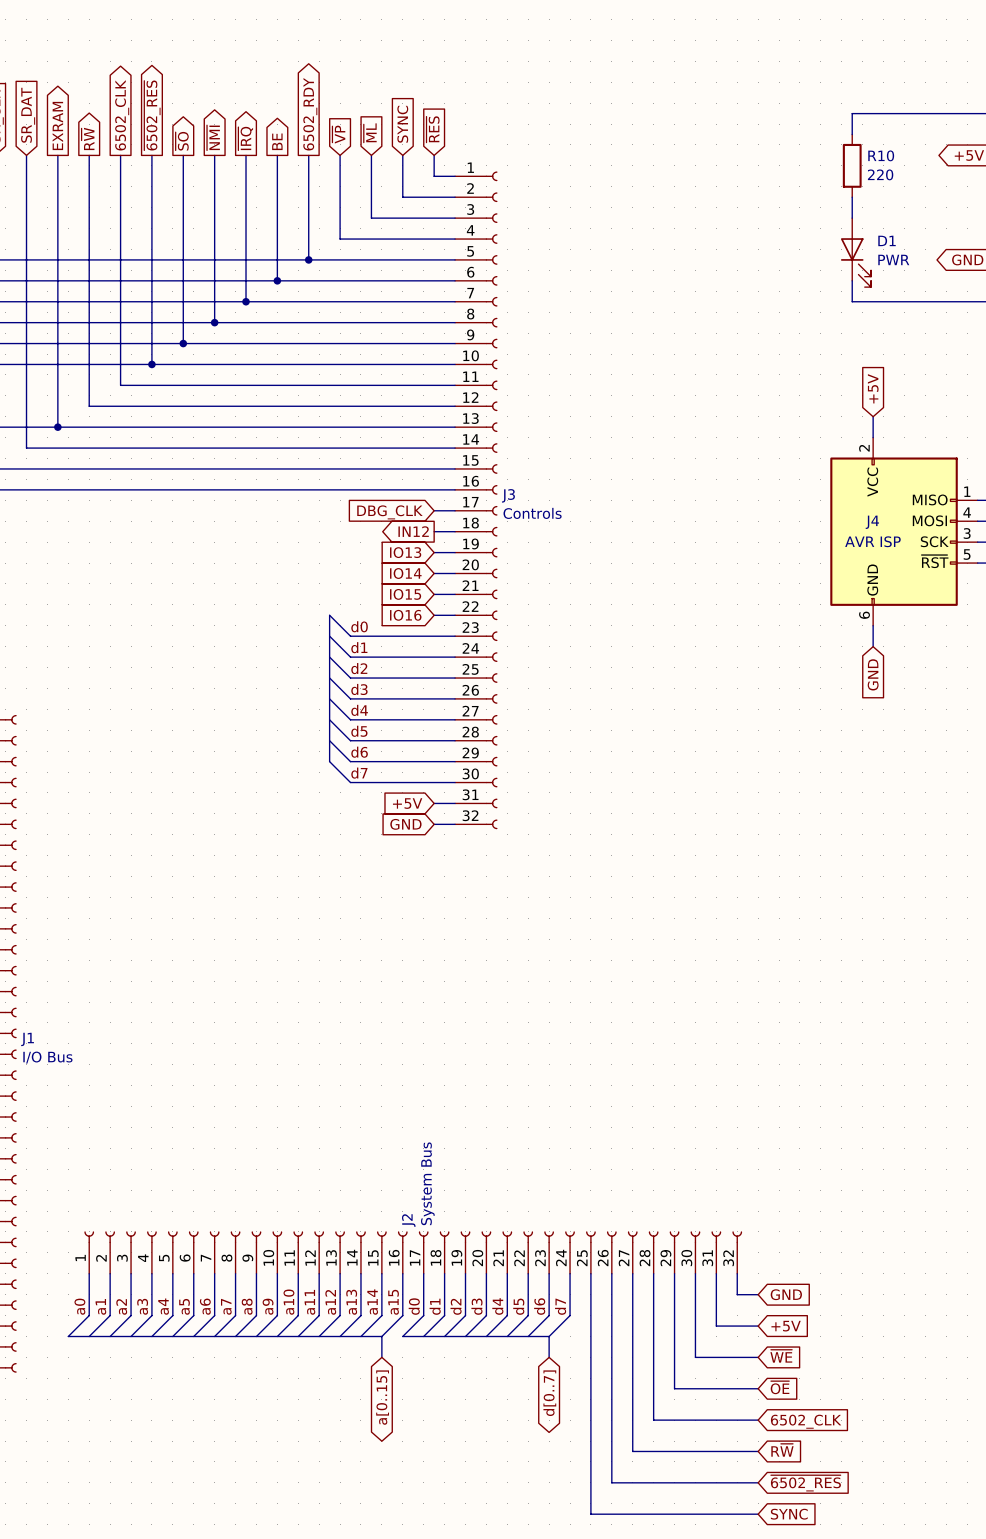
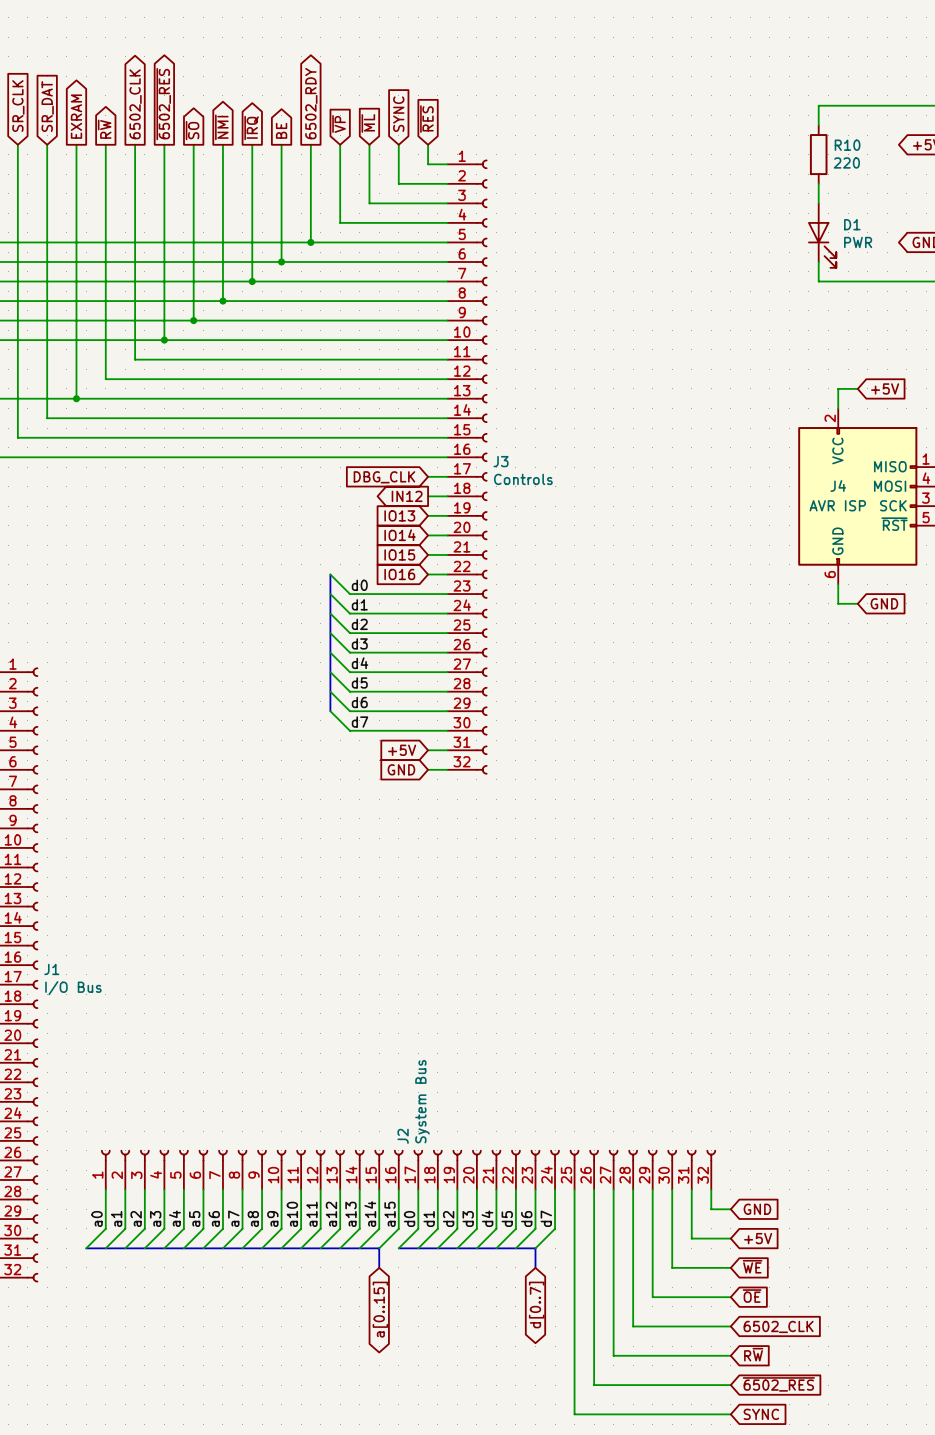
global label rotation: 0° (873, 388) -> 90° clockwise (885, 388)
wire: none -> (838, 388) (857, 388)
wire: none -> (838, 603) (857, 603)
global label rotation: 0° (873, 674) -> 90° counterclockwise (884, 603)

